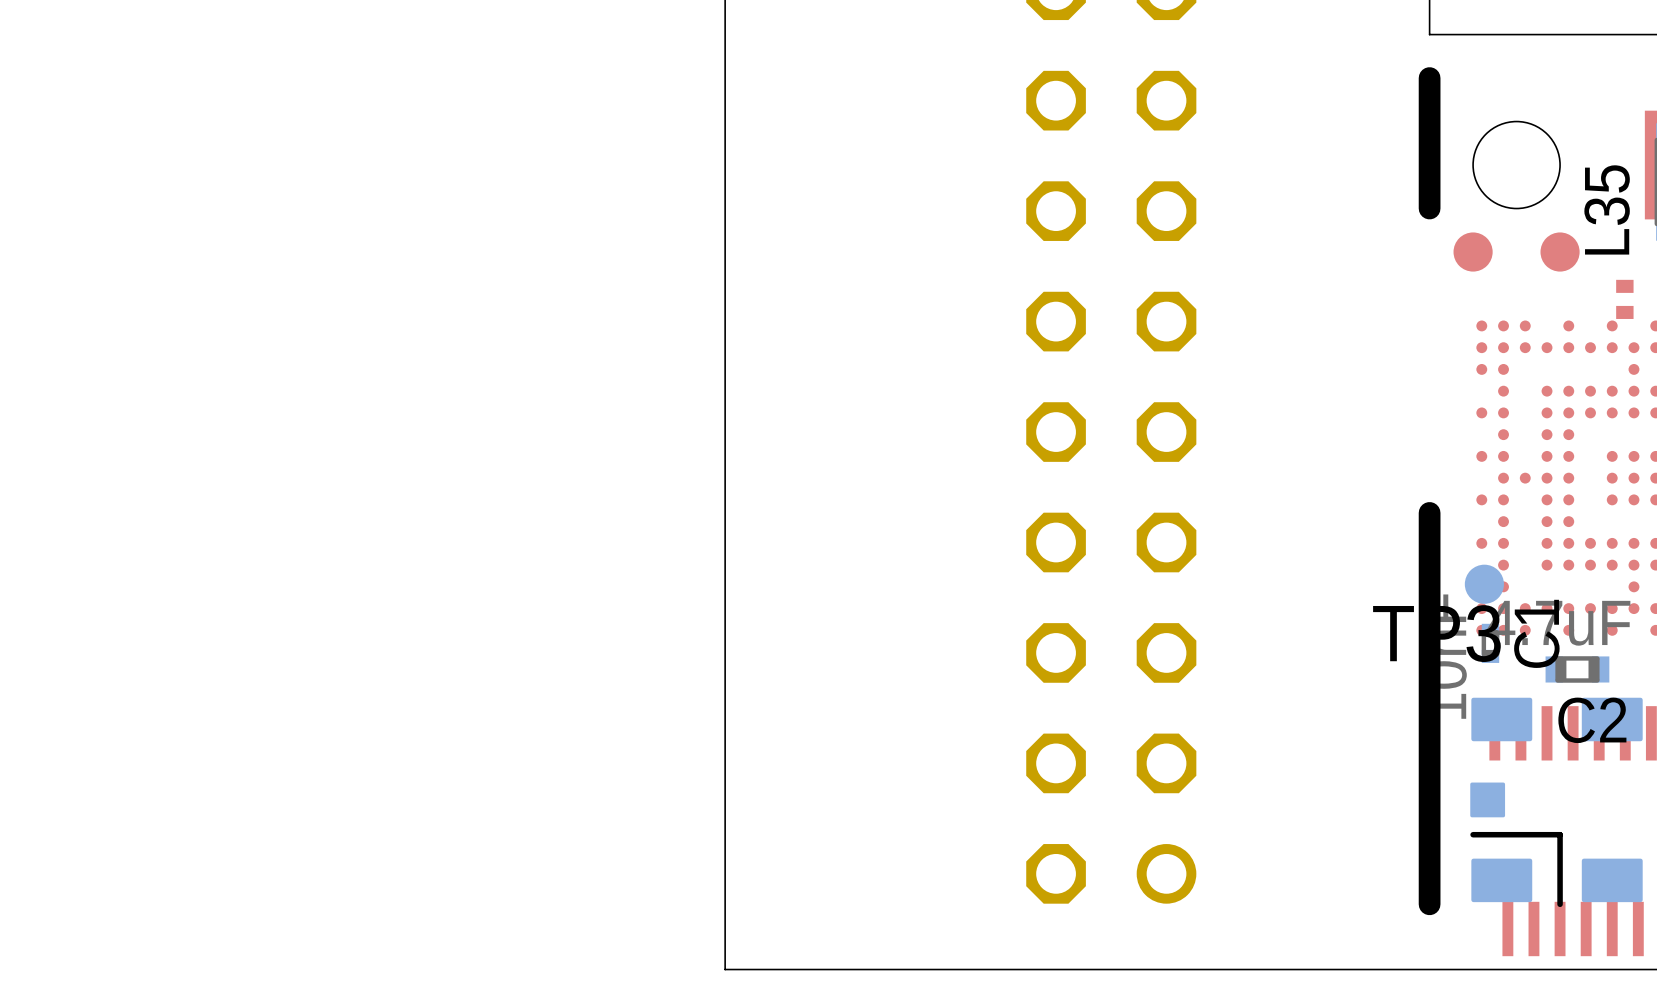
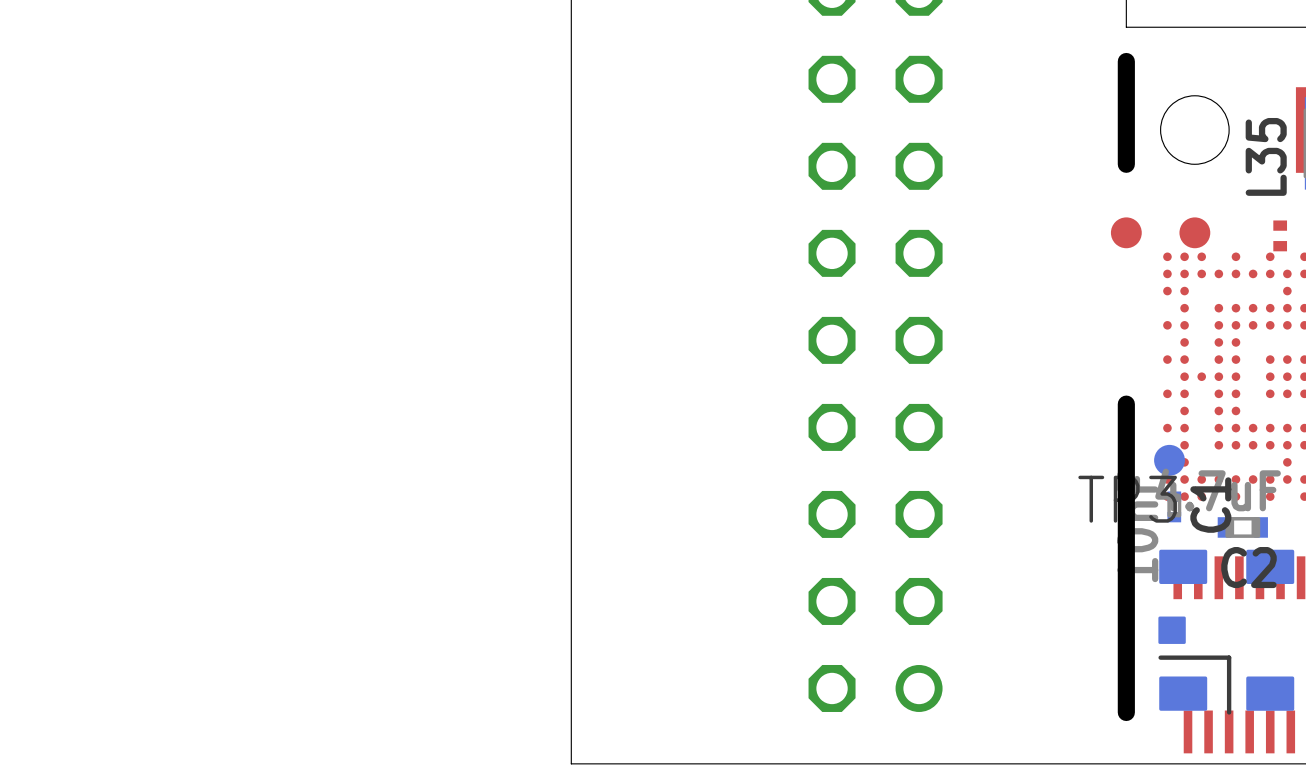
part: (1473, 252) -> none
part: (1560, 252) -> none
part: none -> (1126, 232)
part: none -> (1194, 232)

